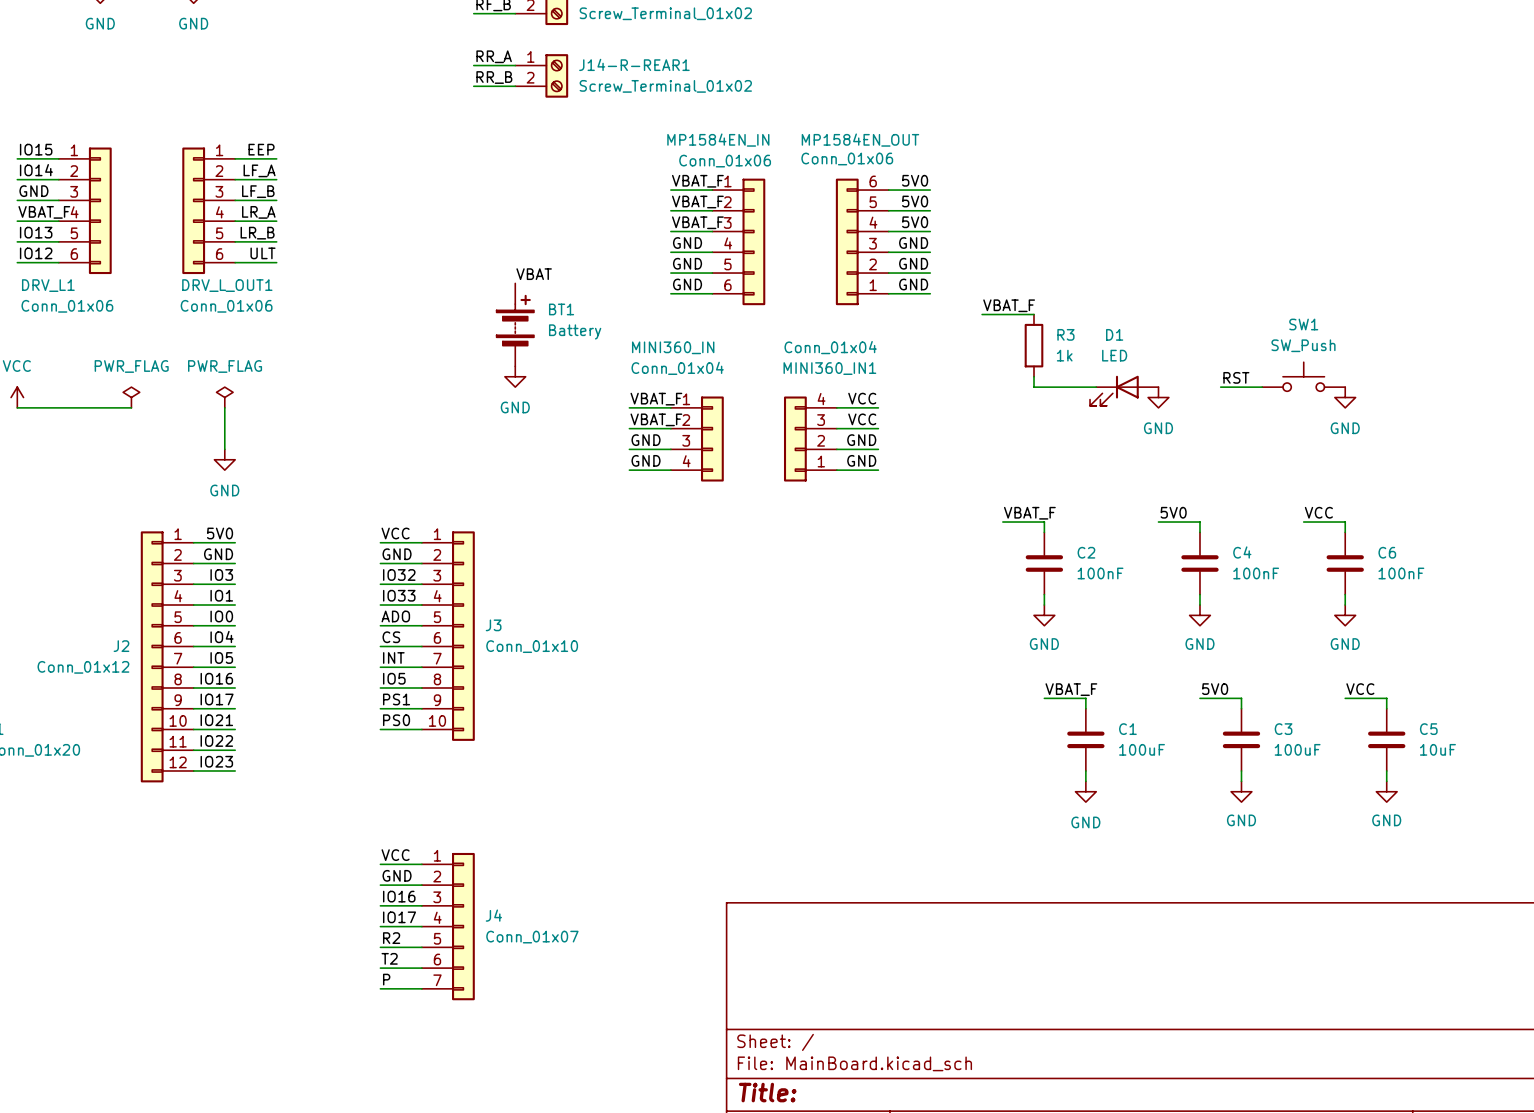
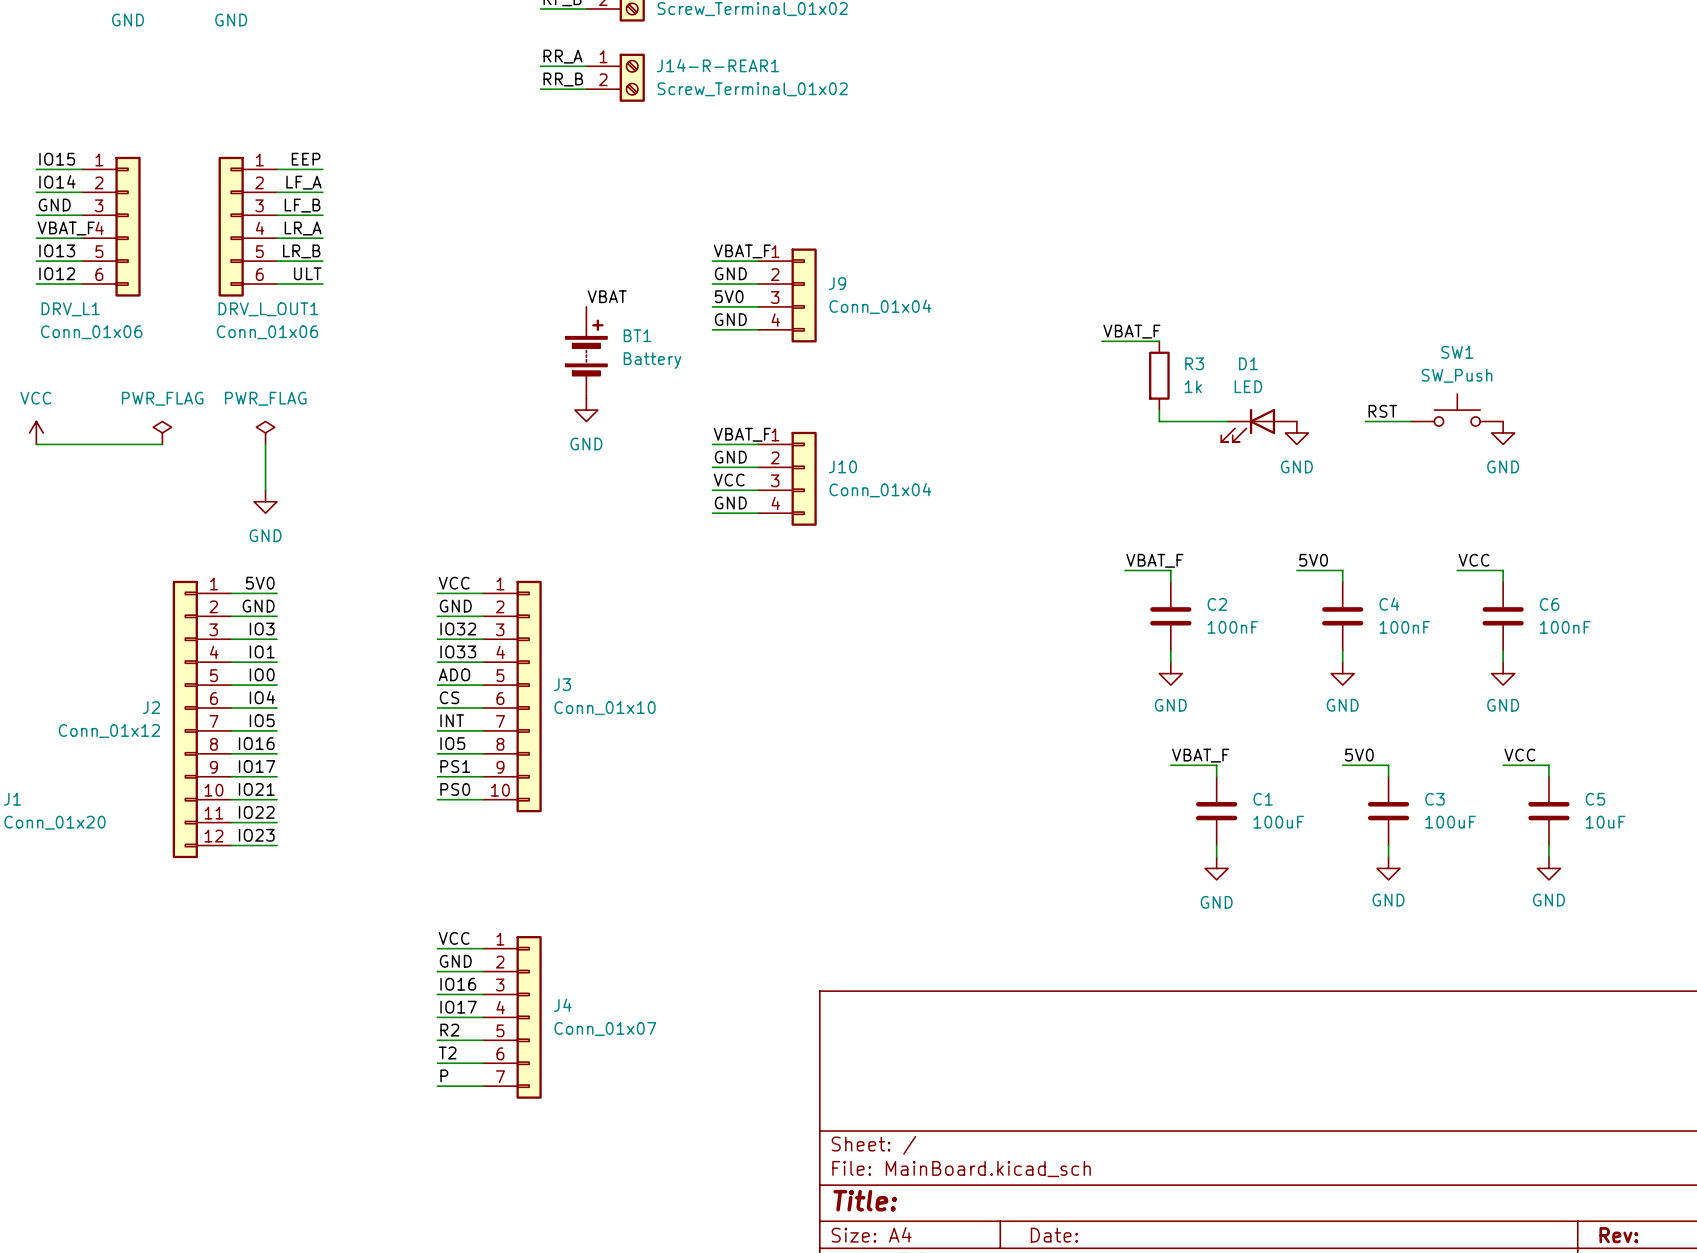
label: 5V0 (915, 180) -> none
label: VBAT_F (697, 181) -> none
wire: (670, 190) (712, 190) -> none
wire: (888, 190) (930, 190) -> none
label: 5V0 (915, 201) -> none
label: VBAT_F (697, 202) -> none
wire: (670, 210) (712, 210) -> none
wire: (888, 210) (930, 210) -> none
label position: VBAT_F (697, 222) -> VBAT_F (742, 251)
label: 5V0 (915, 222) -> none
wire: (670, 231) (712, 231) -> (712, 261) (758, 261)
wire: (888, 231) (930, 231) -> none
MP1584EN_IN: Conn_01x06 (738, 241) -> none
MP1584EN_OUT: Conn_01x06 (862, 241) -> none
label: GND (687, 243) -> none
label: GND (913, 243) -> none
wire: (670, 252) (712, 252) -> (712, 284) (758, 284)
wire: (888, 252) (930, 252) -> none
label: none -> GND (730, 273)
label: GND (687, 263) -> none
label: GND (913, 263) -> none
wire: (670, 273) (712, 273) -> (712, 306) (758, 306)
J9: none -> Conn_01x04 (787, 295)
wire: (888, 273) (930, 273) -> none
label: none -> 5V0 (729, 296)
label: GND (687, 284) -> none
label: GND (913, 284) -> none
wire: (670, 293) (712, 293) -> (712, 329) (758, 329)
wire: (888, 293) (930, 293) -> none
label: none -> GND (730, 319)
MINI360_IN name: MINI360_IN (673, 347) -> J10 (842, 466)
MINI360_IN value position: Conn_01x04 (677, 368) -> Conn_01x04 (880, 490)
label: VCC (862, 398) -> none
wire: (836, 407) (878, 407) -> none
label: VBAT_F (656, 419) -> GND (730, 457)
label: VCC (862, 419) -> none
wire: (836, 428) (878, 428) -> none
MINI360_IN1: Conn_01x04 (810, 439) -> none
label: GND (646, 440) -> VCC (729, 480)
label: GND (861, 440) -> none
wire: (836, 449) (878, 449) -> none
label: GND (861, 460) -> none
wire: (836, 470) (878, 470) -> none

